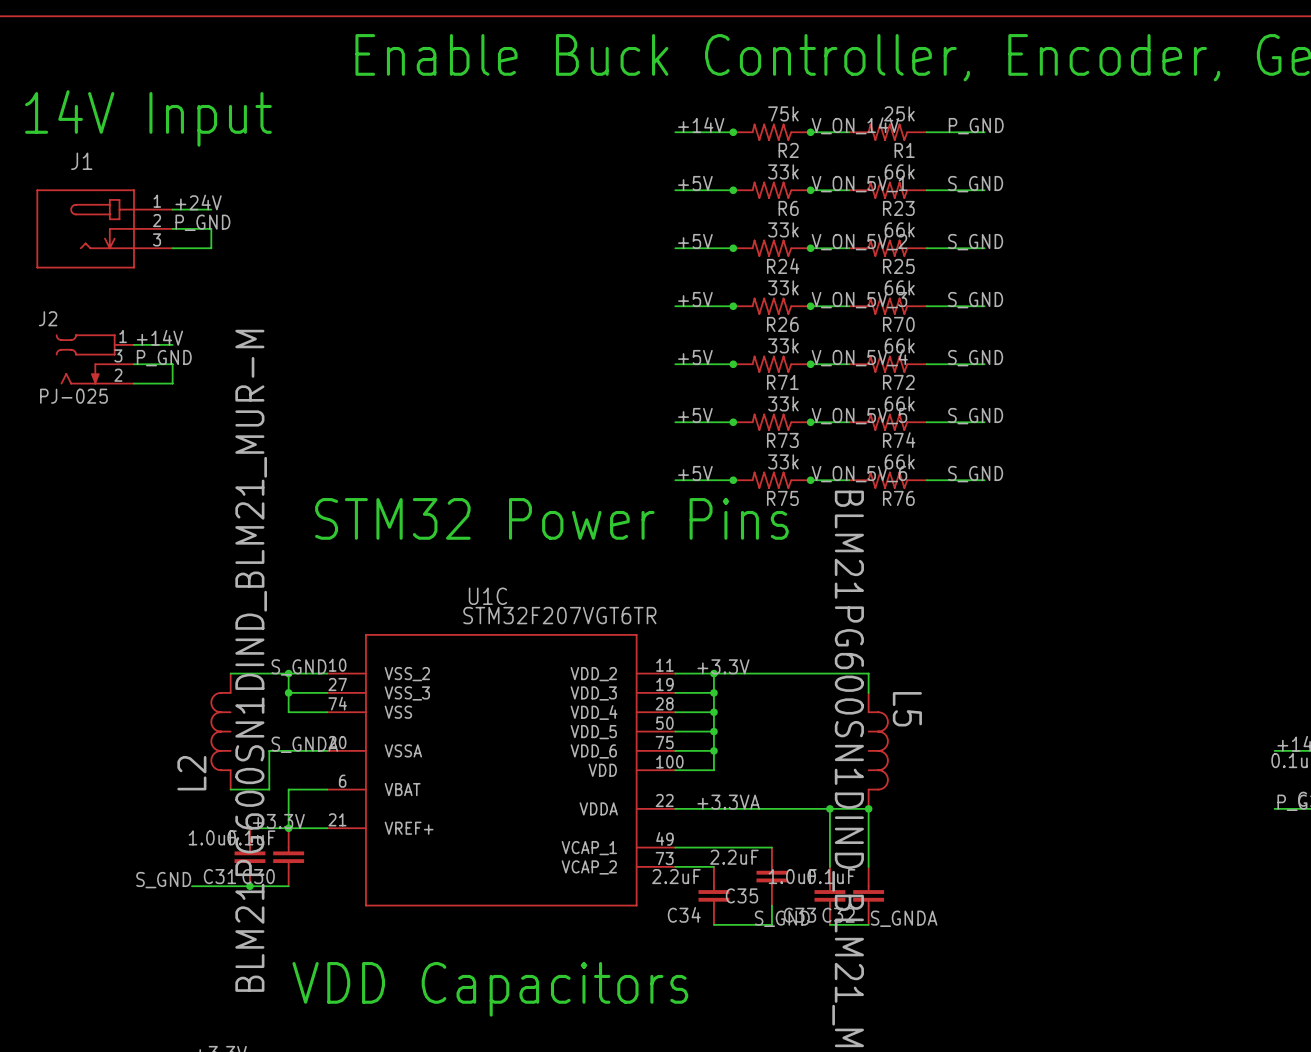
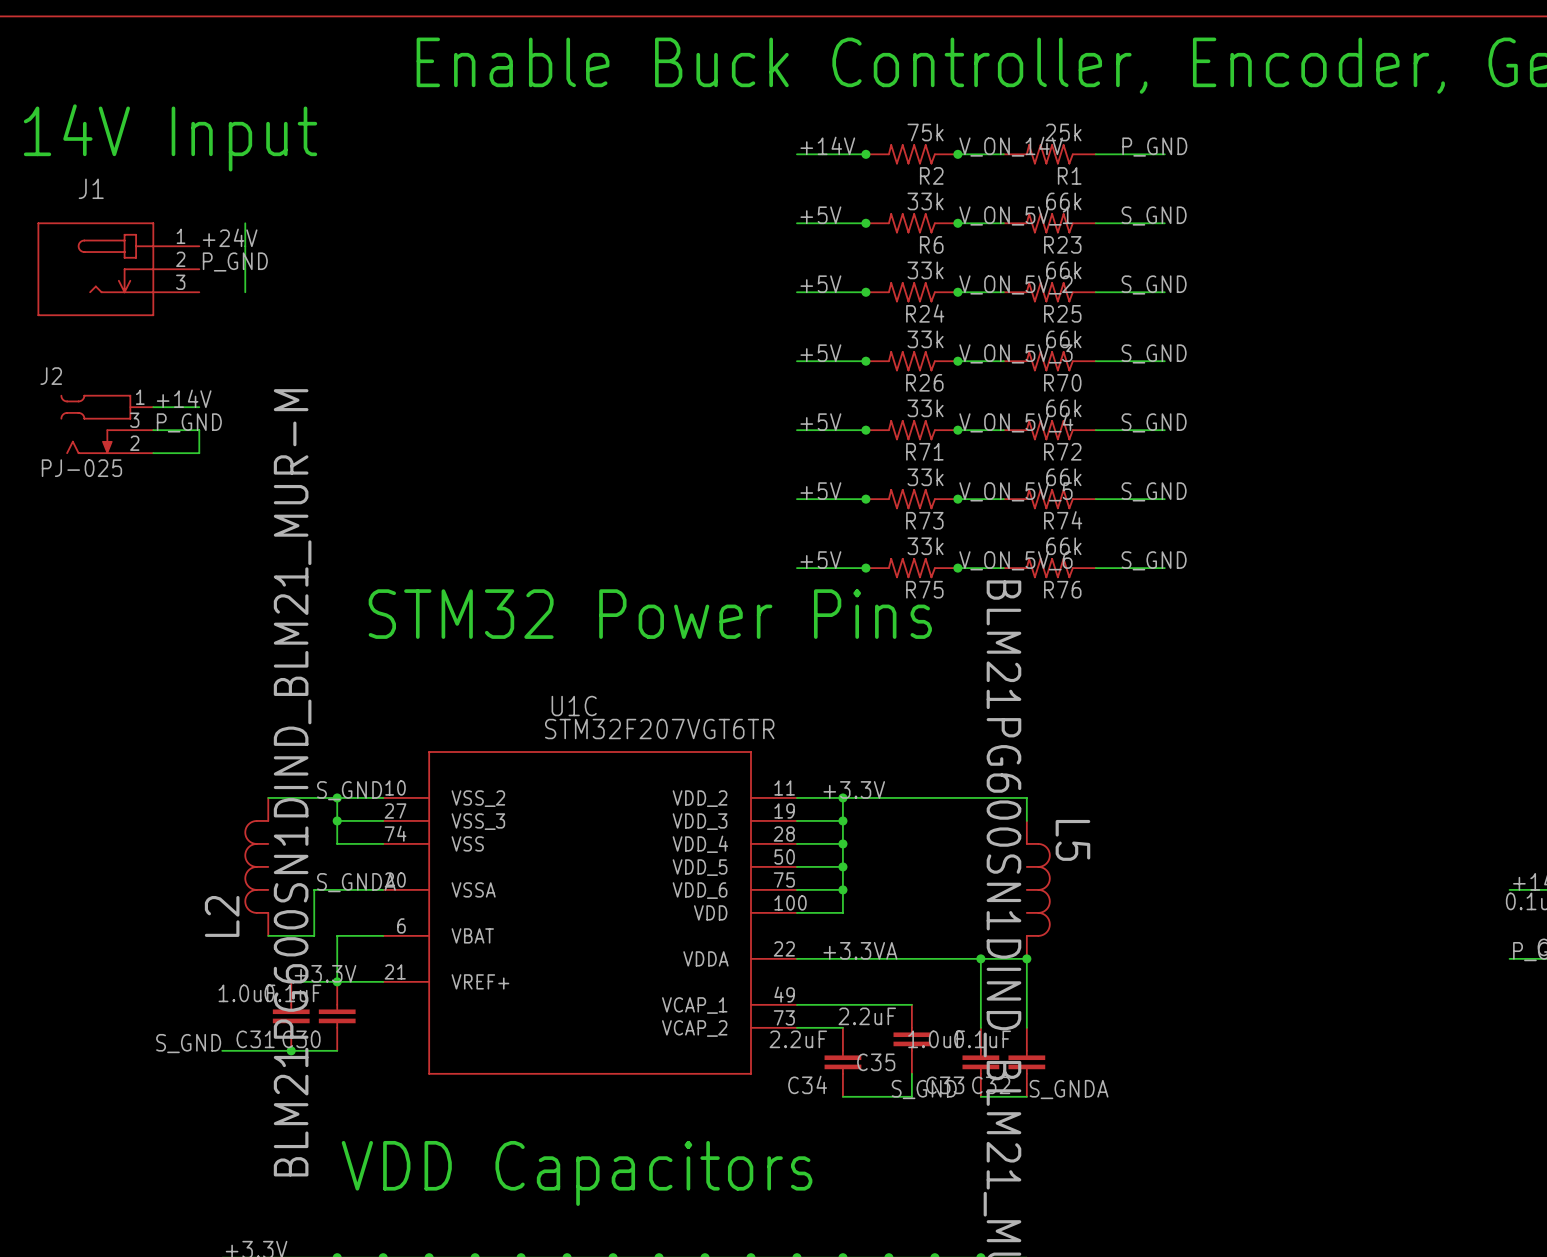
wire: (172, 209) (211, 209) -> none
wire: (172, 228) (211, 228) -> (245, 223) (245, 269)
wire: (172, 248) (211, 248) -> none

